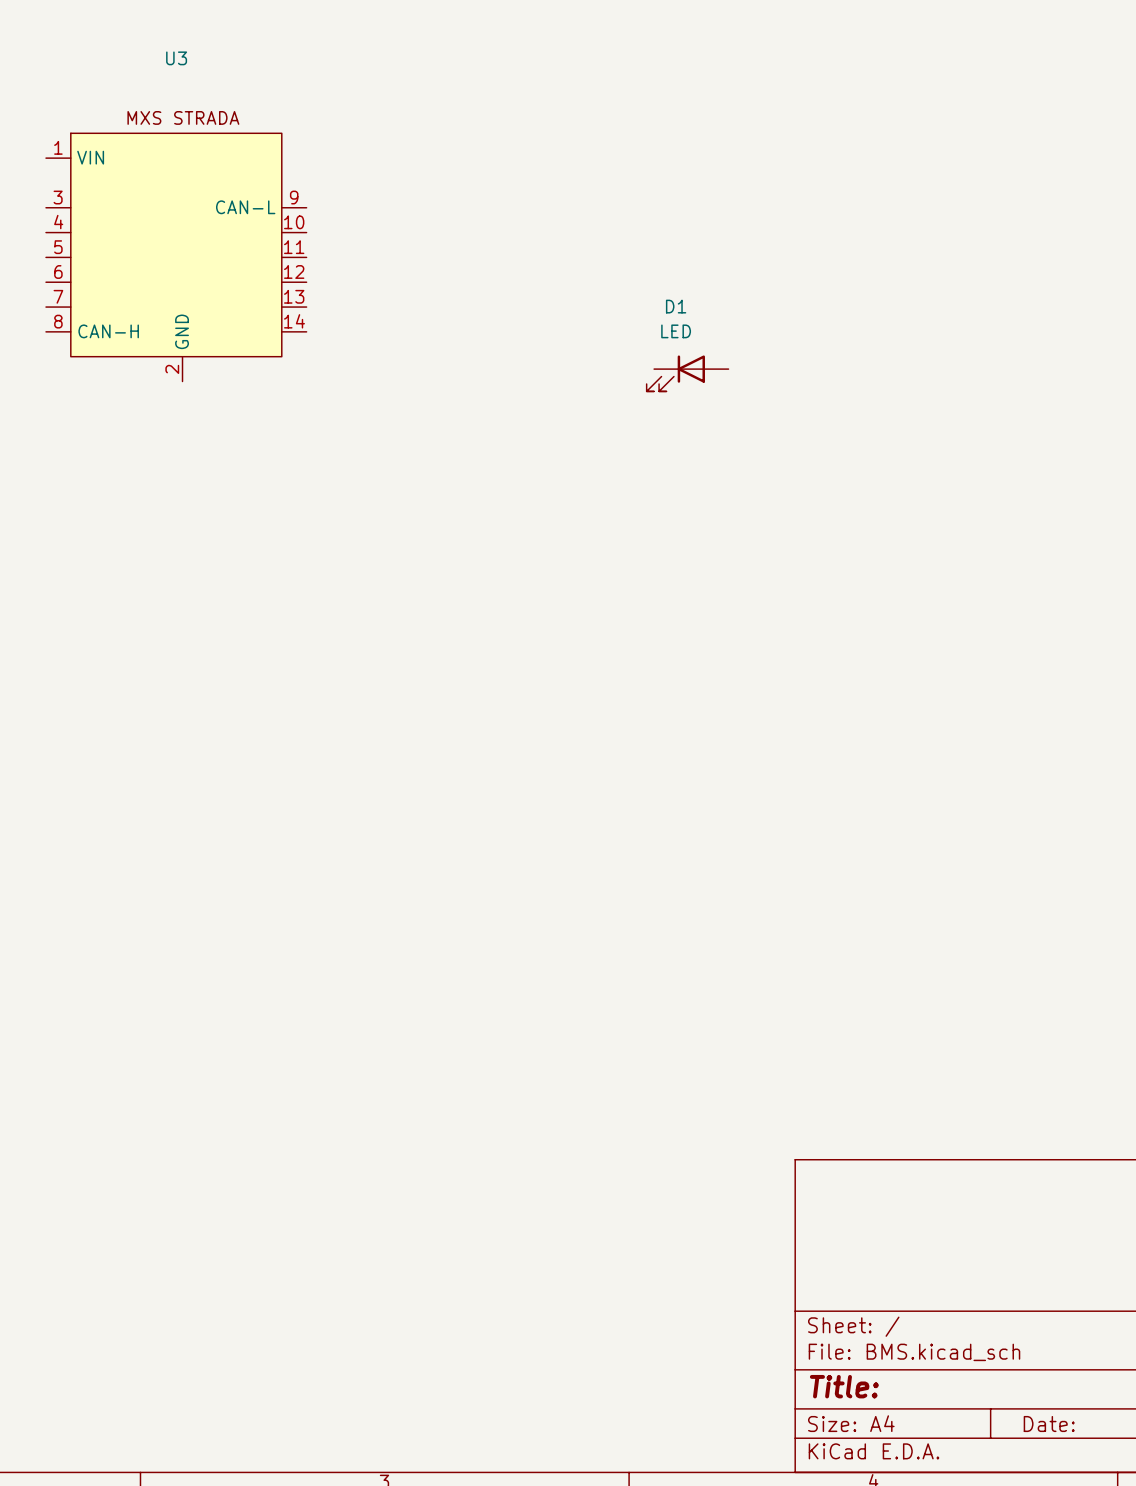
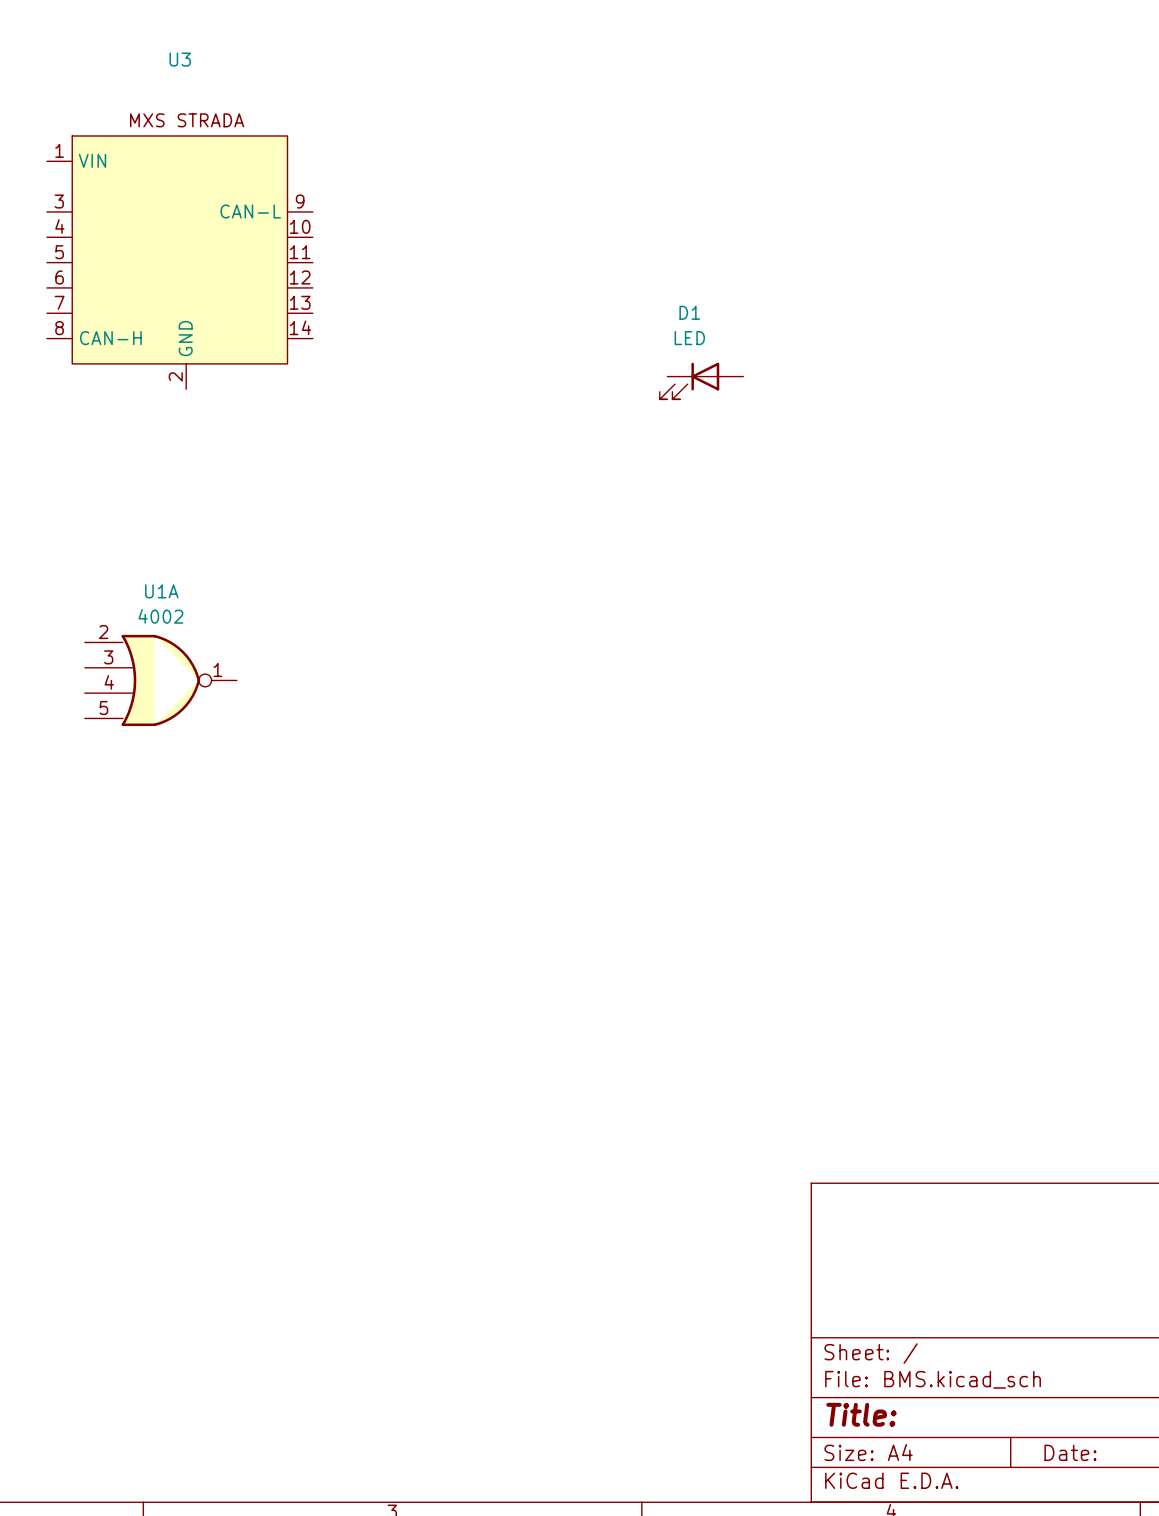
U1A: none -> 4002 (160, 680)

